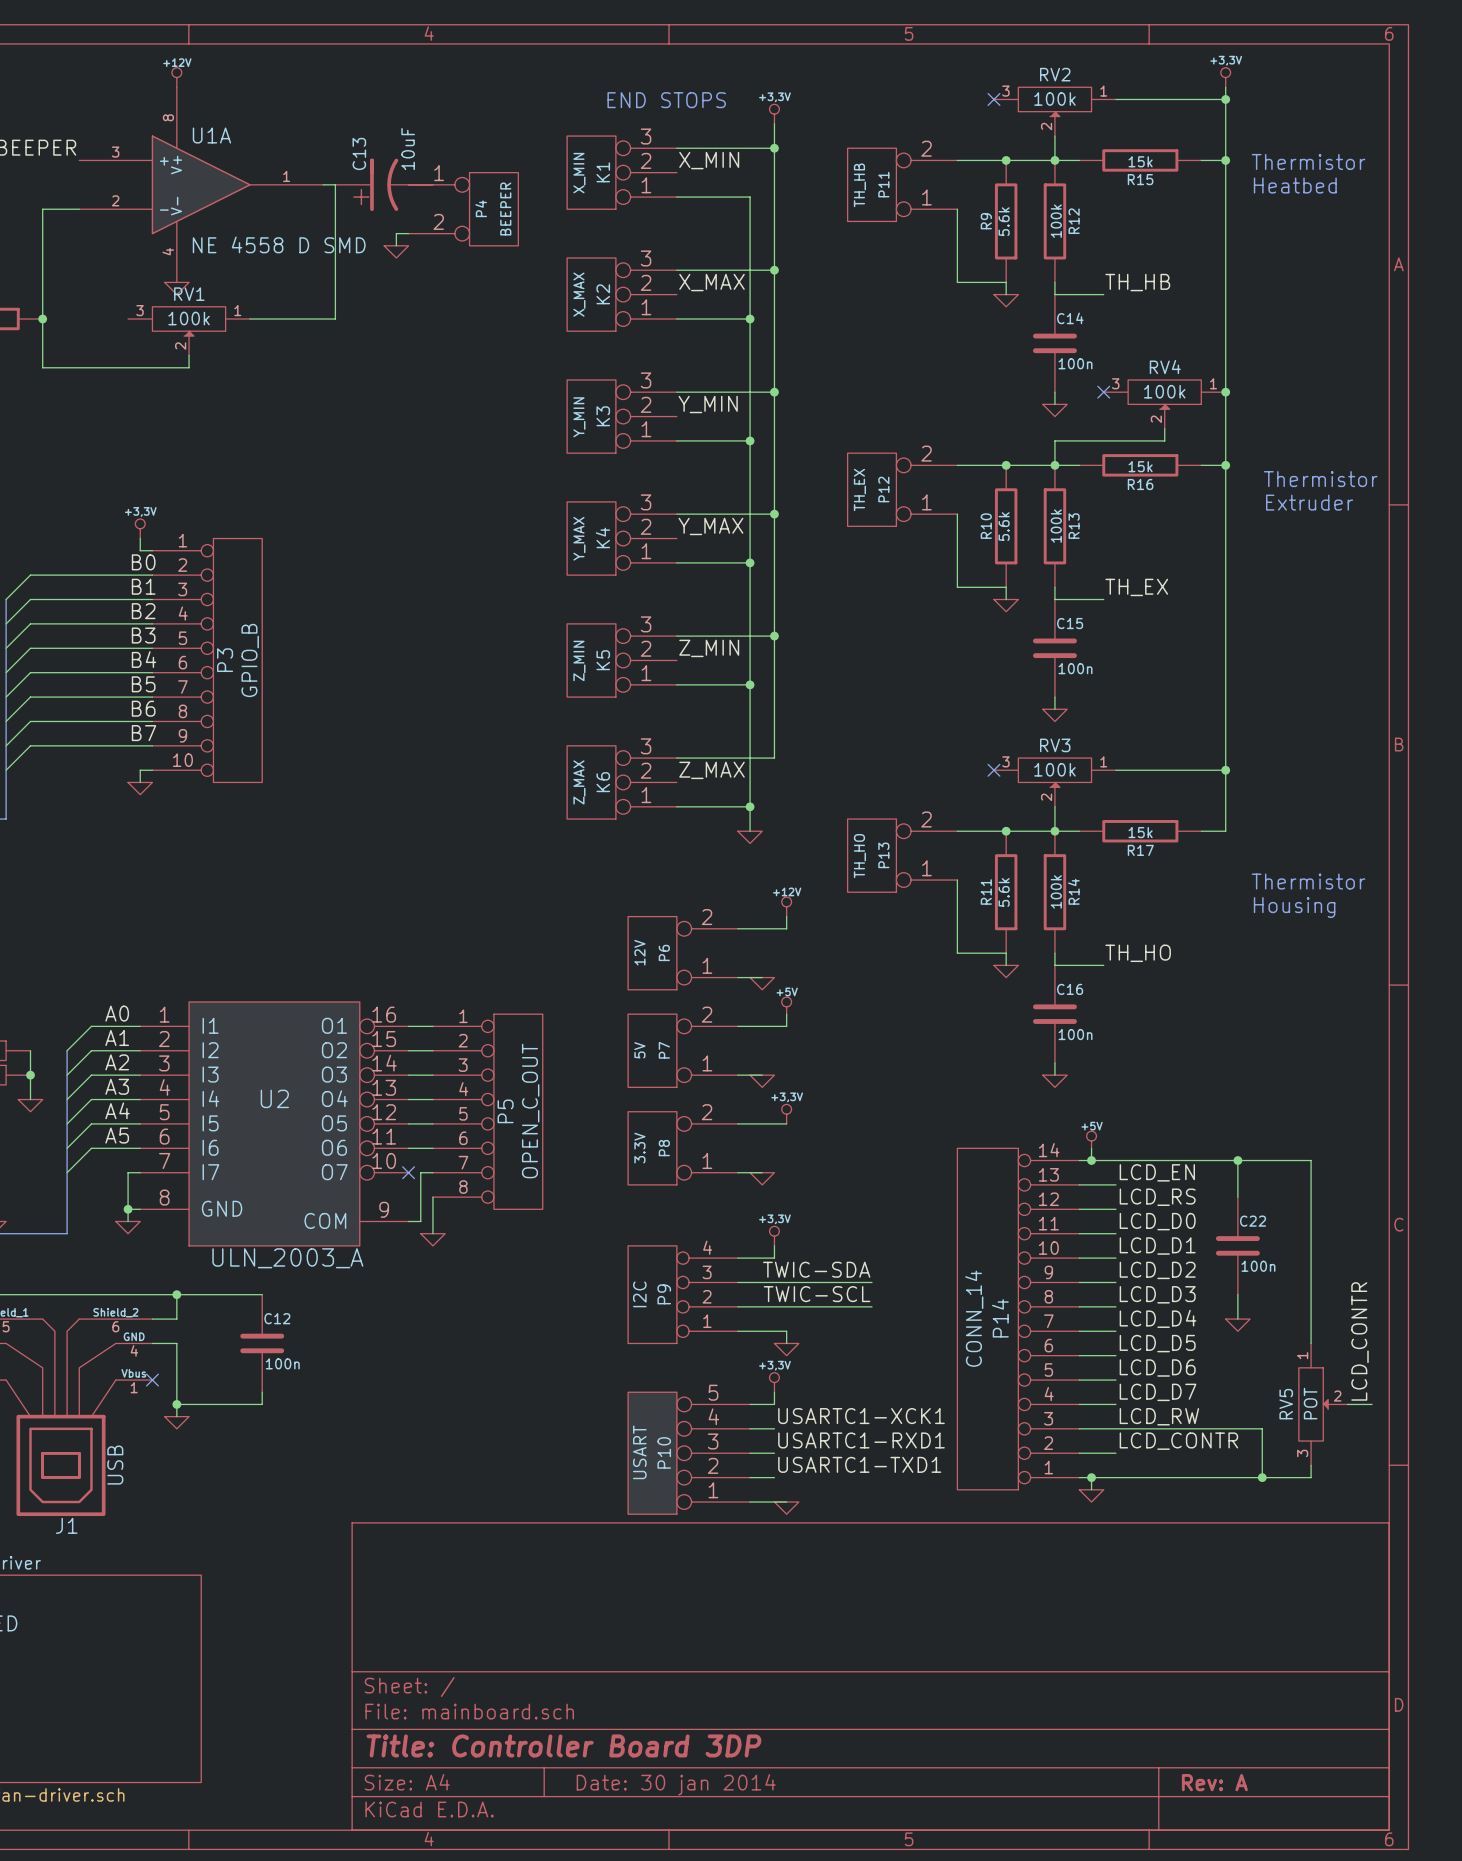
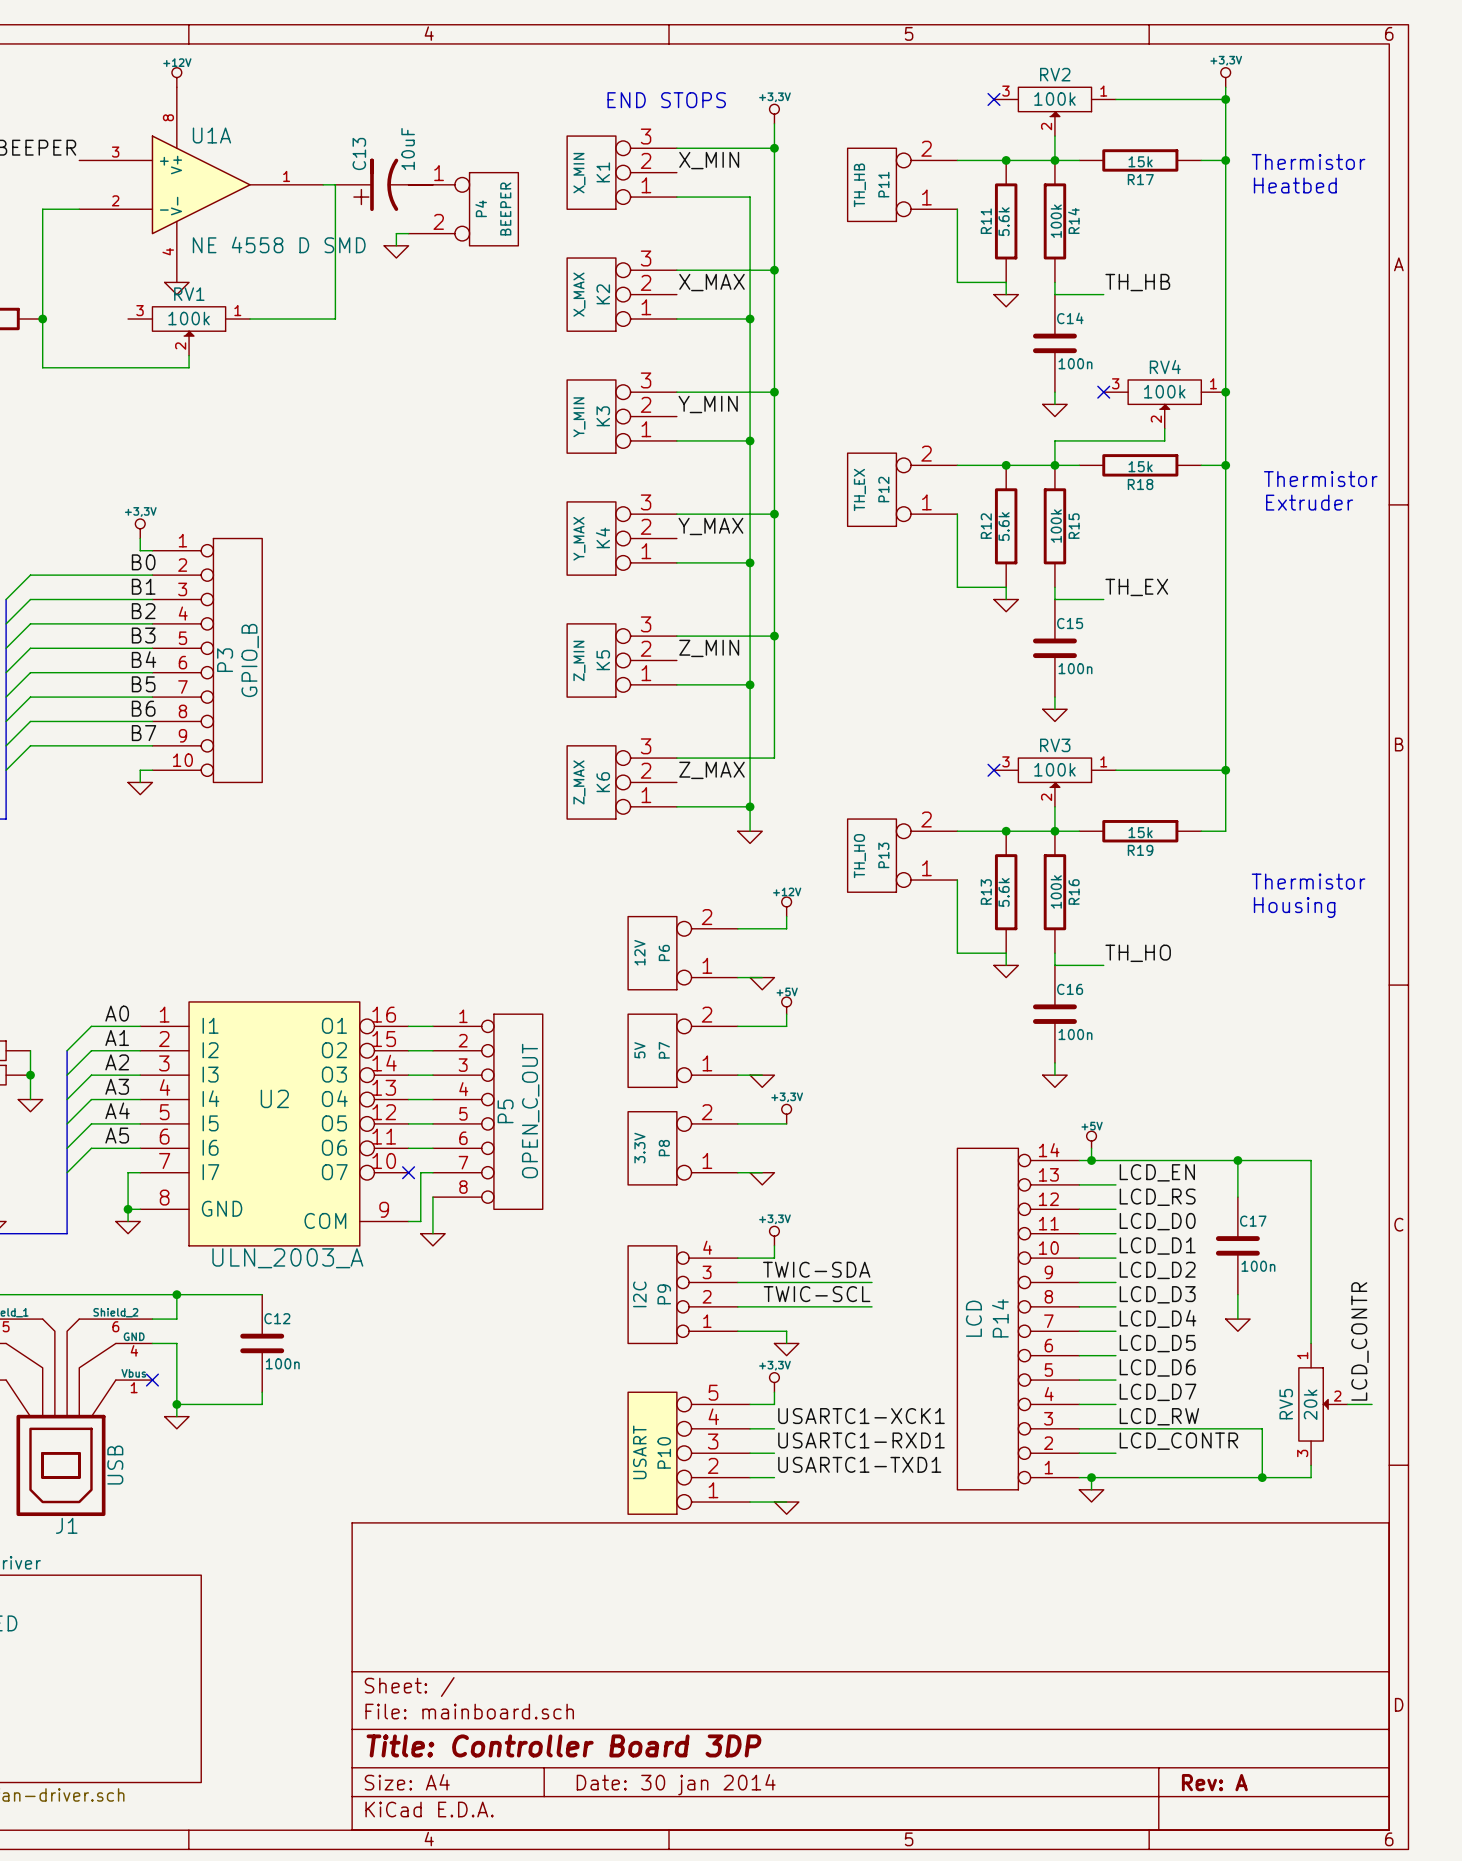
R15 name: R15 (1140, 179) -> R17 (1140, 179)
R9 name: R9 (986, 221) -> R11 (986, 221)
R12 name: R12 (1074, 221) -> R14 (1073, 220)
R16 name: R16 (1140, 484) -> R18 (1140, 484)
R10 name: R10 (986, 526) -> R12 (986, 526)
R13 name: R13 (1074, 526) -> R15 (1074, 526)
R17 name: R17 (1140, 850) -> R19 (1140, 850)
R11 name: R11 (986, 891) -> R13 (986, 891)
R14 name: R14 (1073, 891) -> R16 (1074, 891)
C22 name: C22 (1253, 1221) -> C17 (1253, 1221)
P14 value: CONN_14 (974, 1318) -> LCD (973, 1318)
RV5 value: POT (1310, 1403) -> 20k (1310, 1404)

